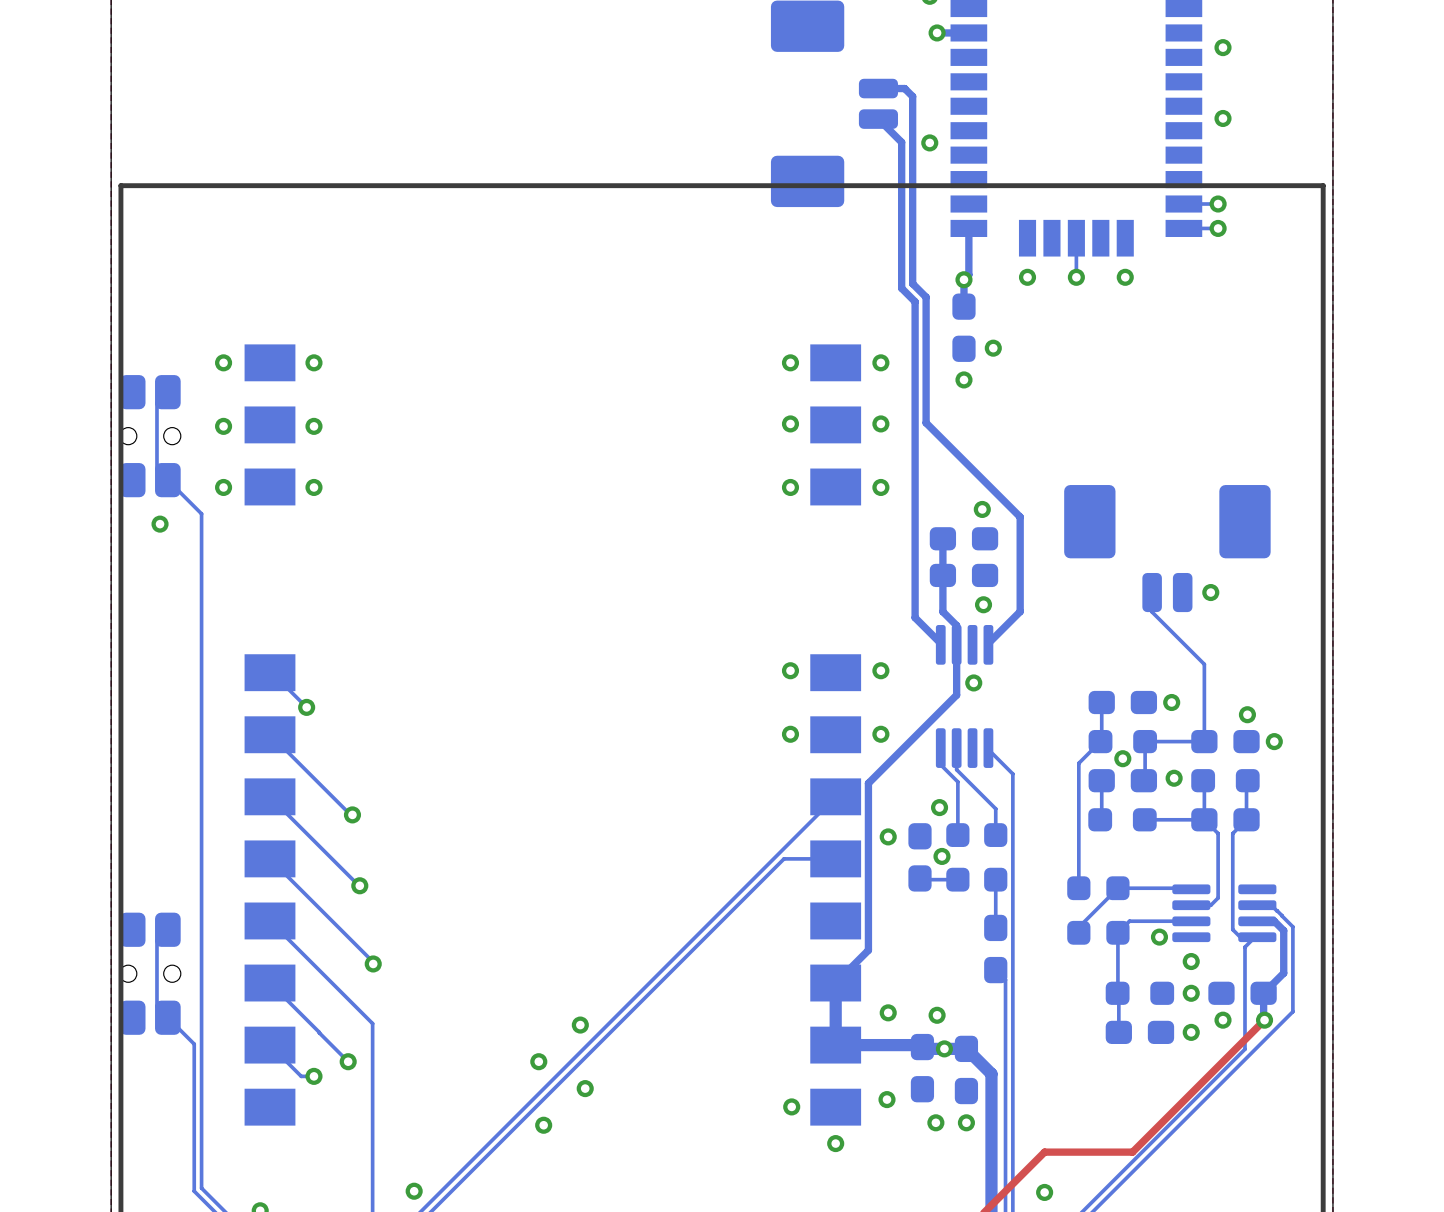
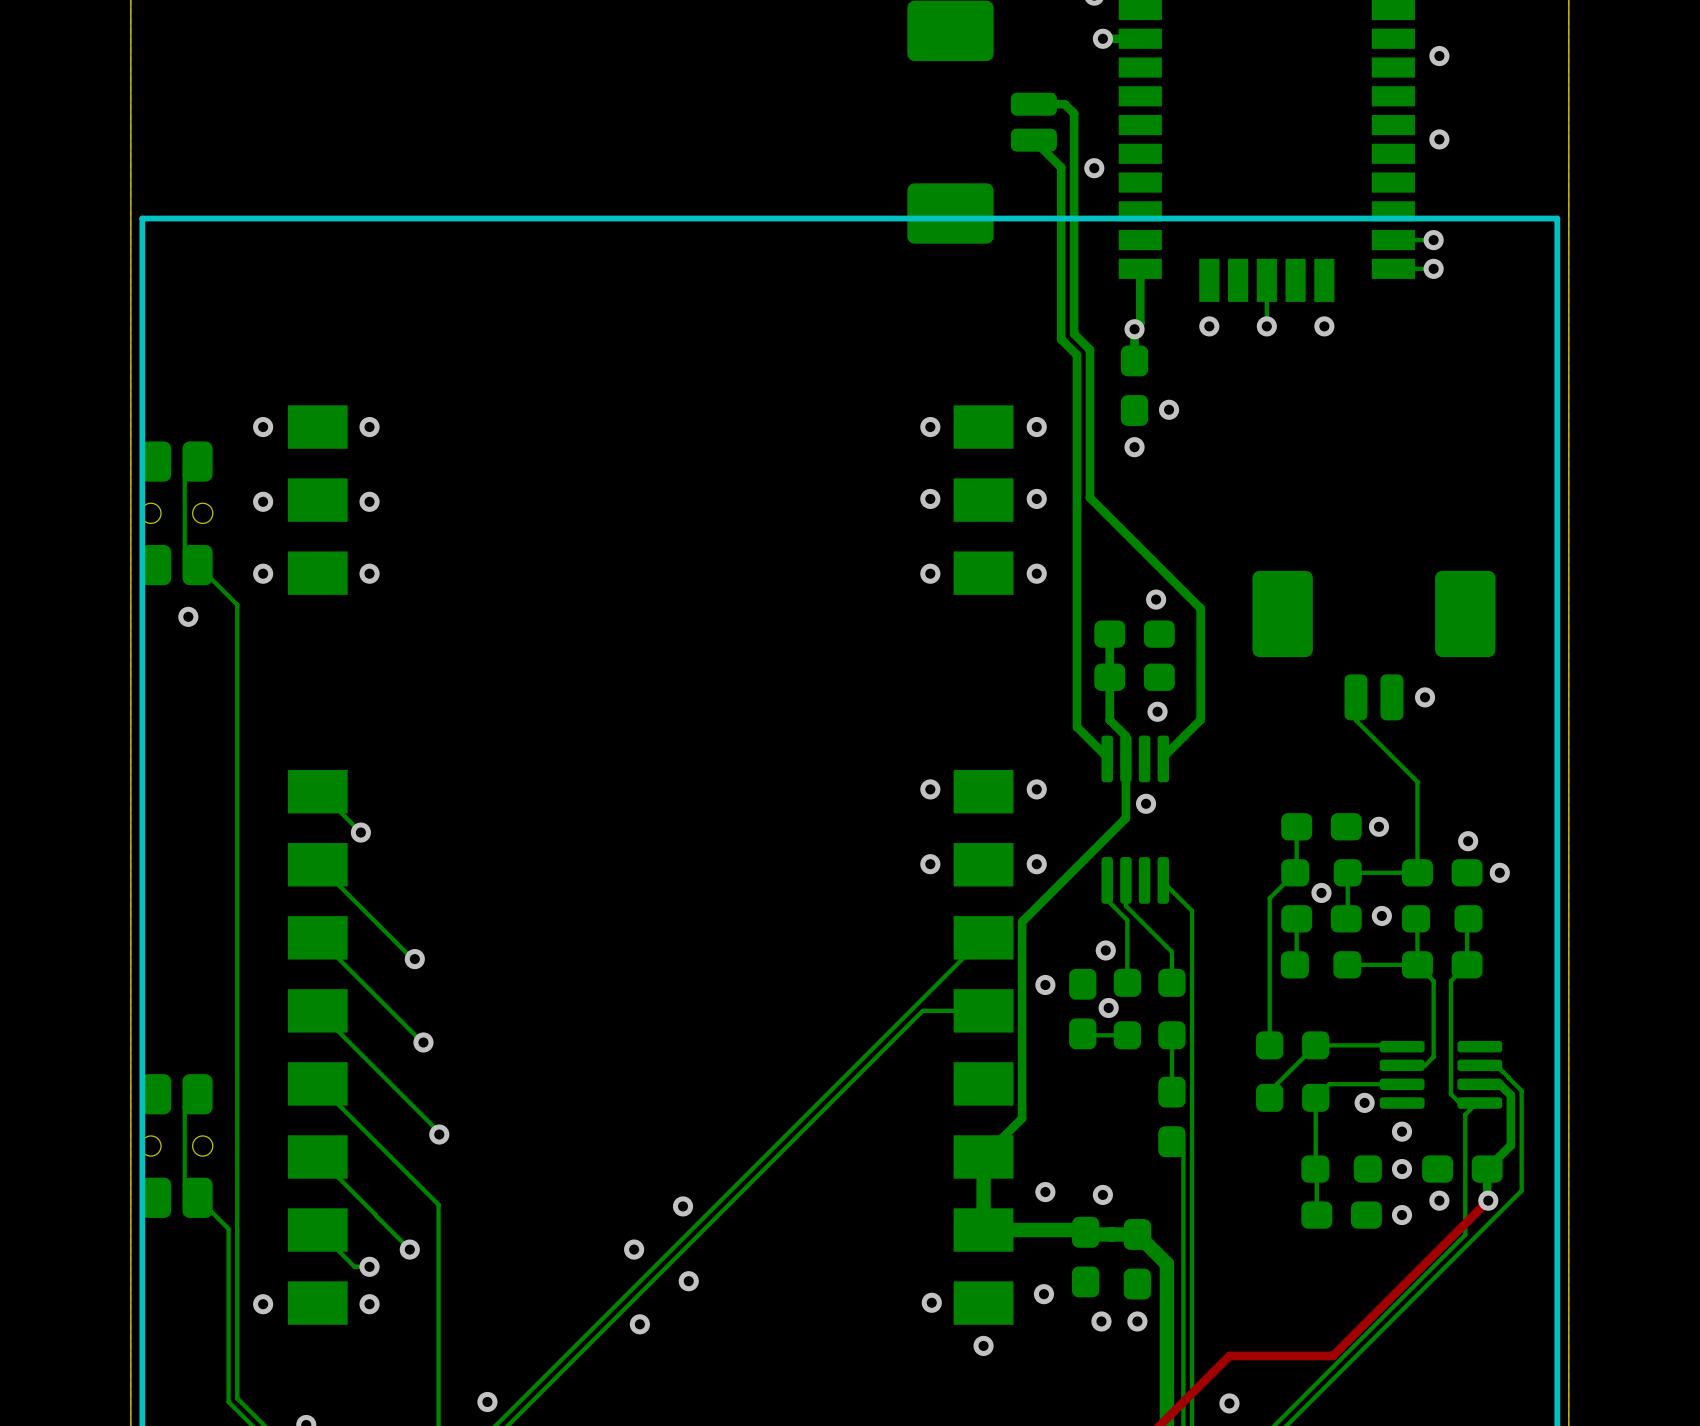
via: (944, 1048) -> none
via: none -> (263, 1304)
via: none -> (369, 1304)

